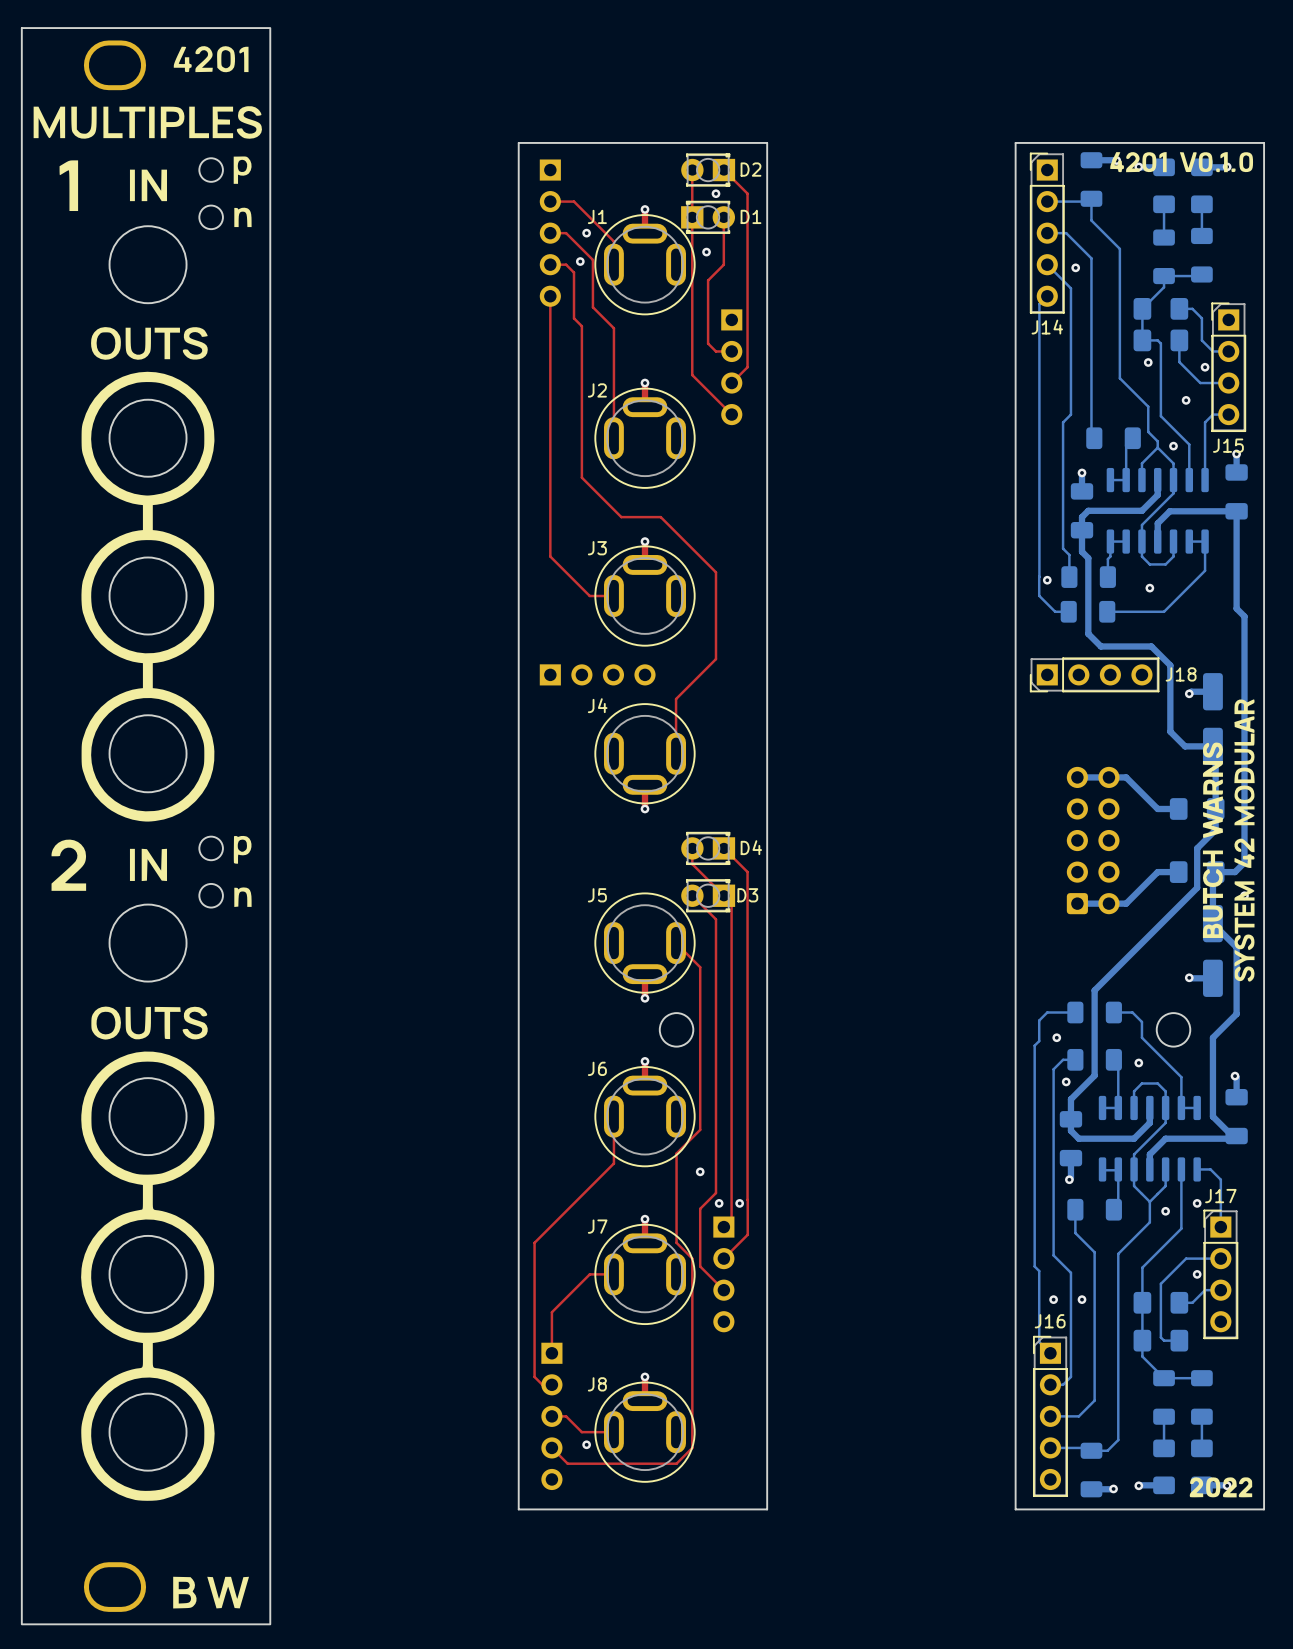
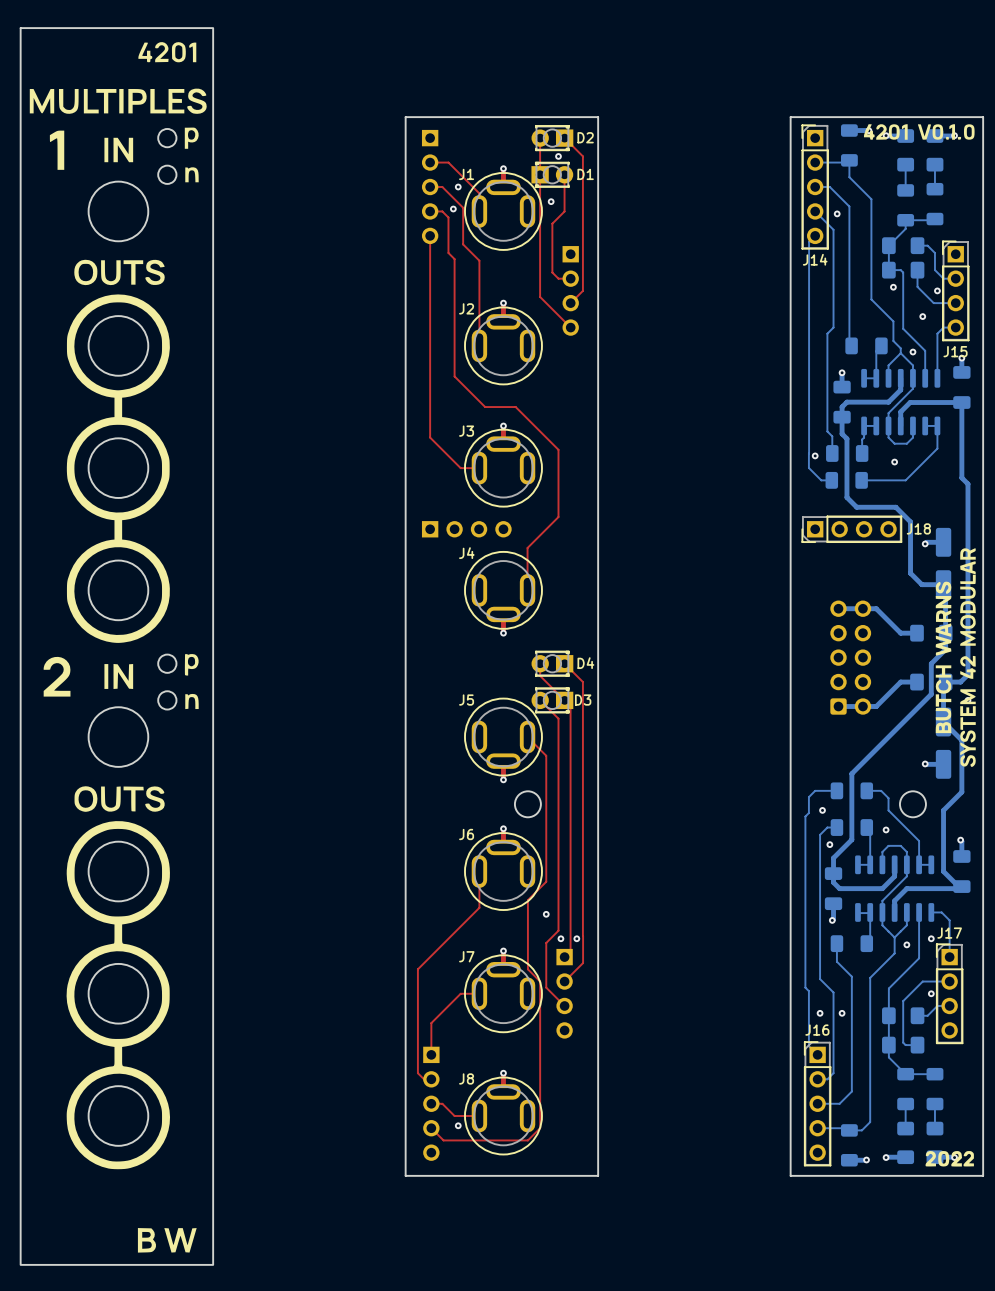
part footprint: [21, 27, 272, 1626] -> [20, 27, 214, 1266]

